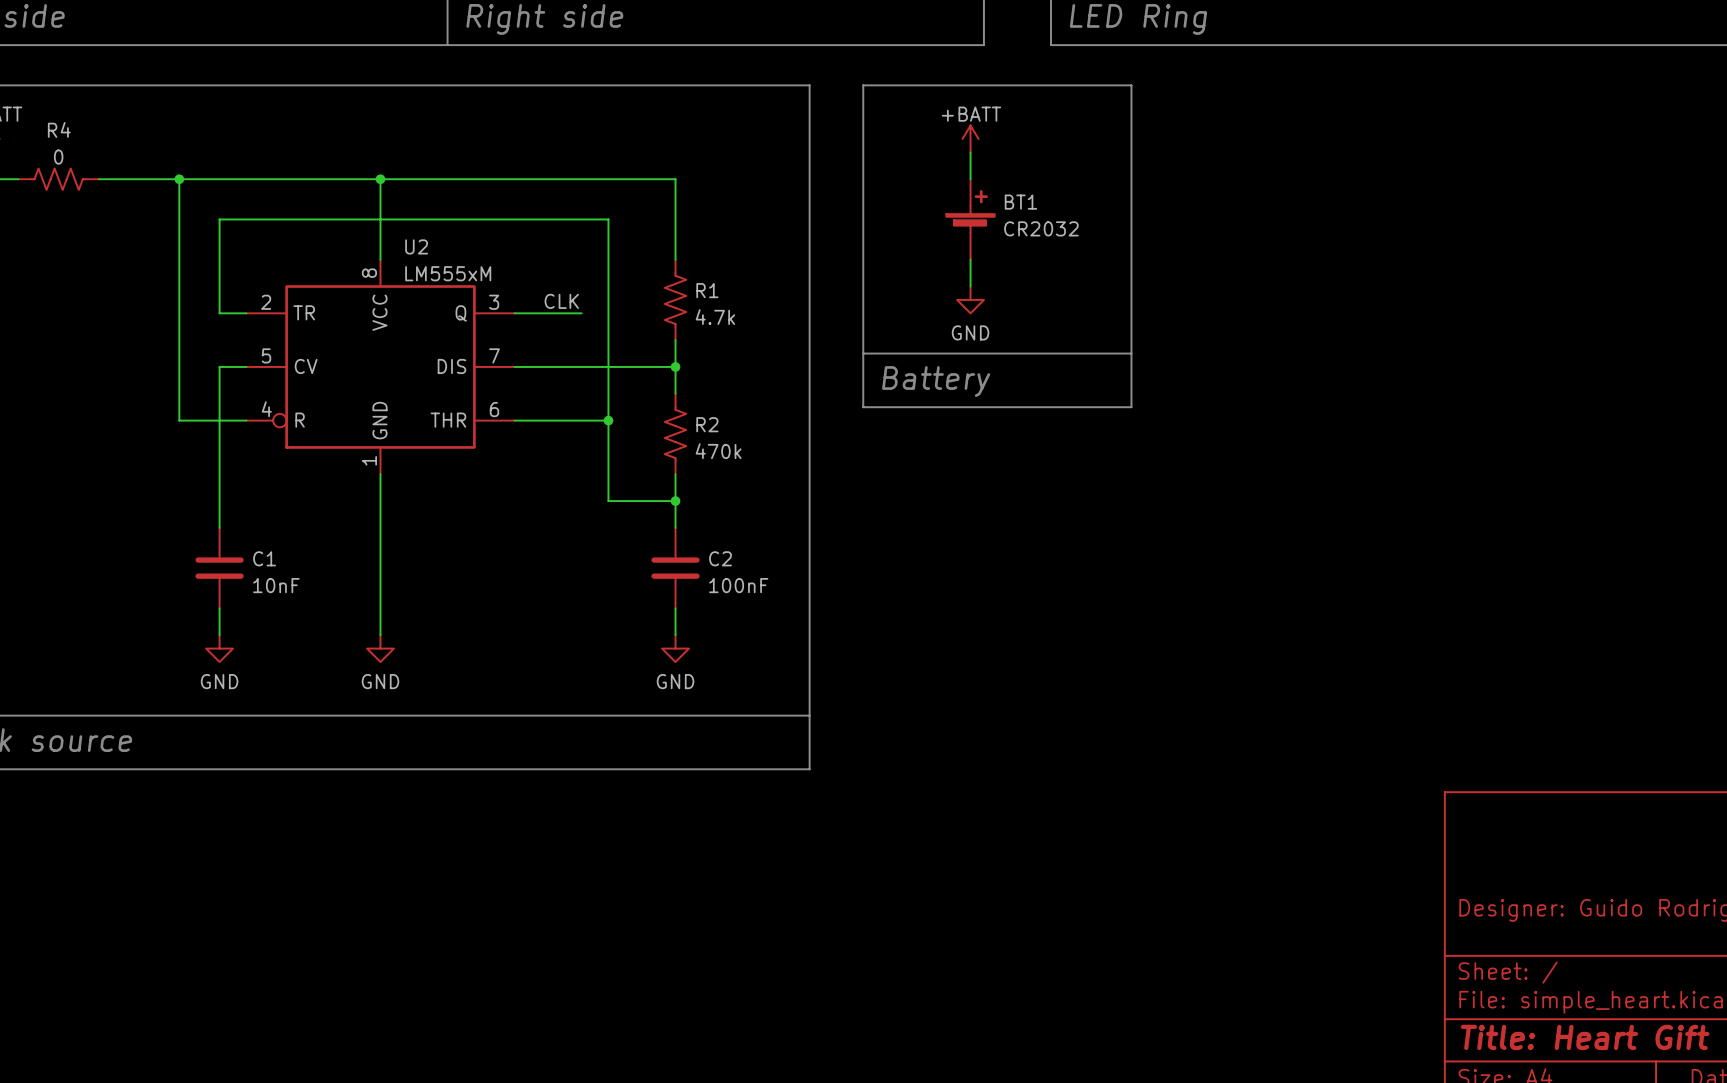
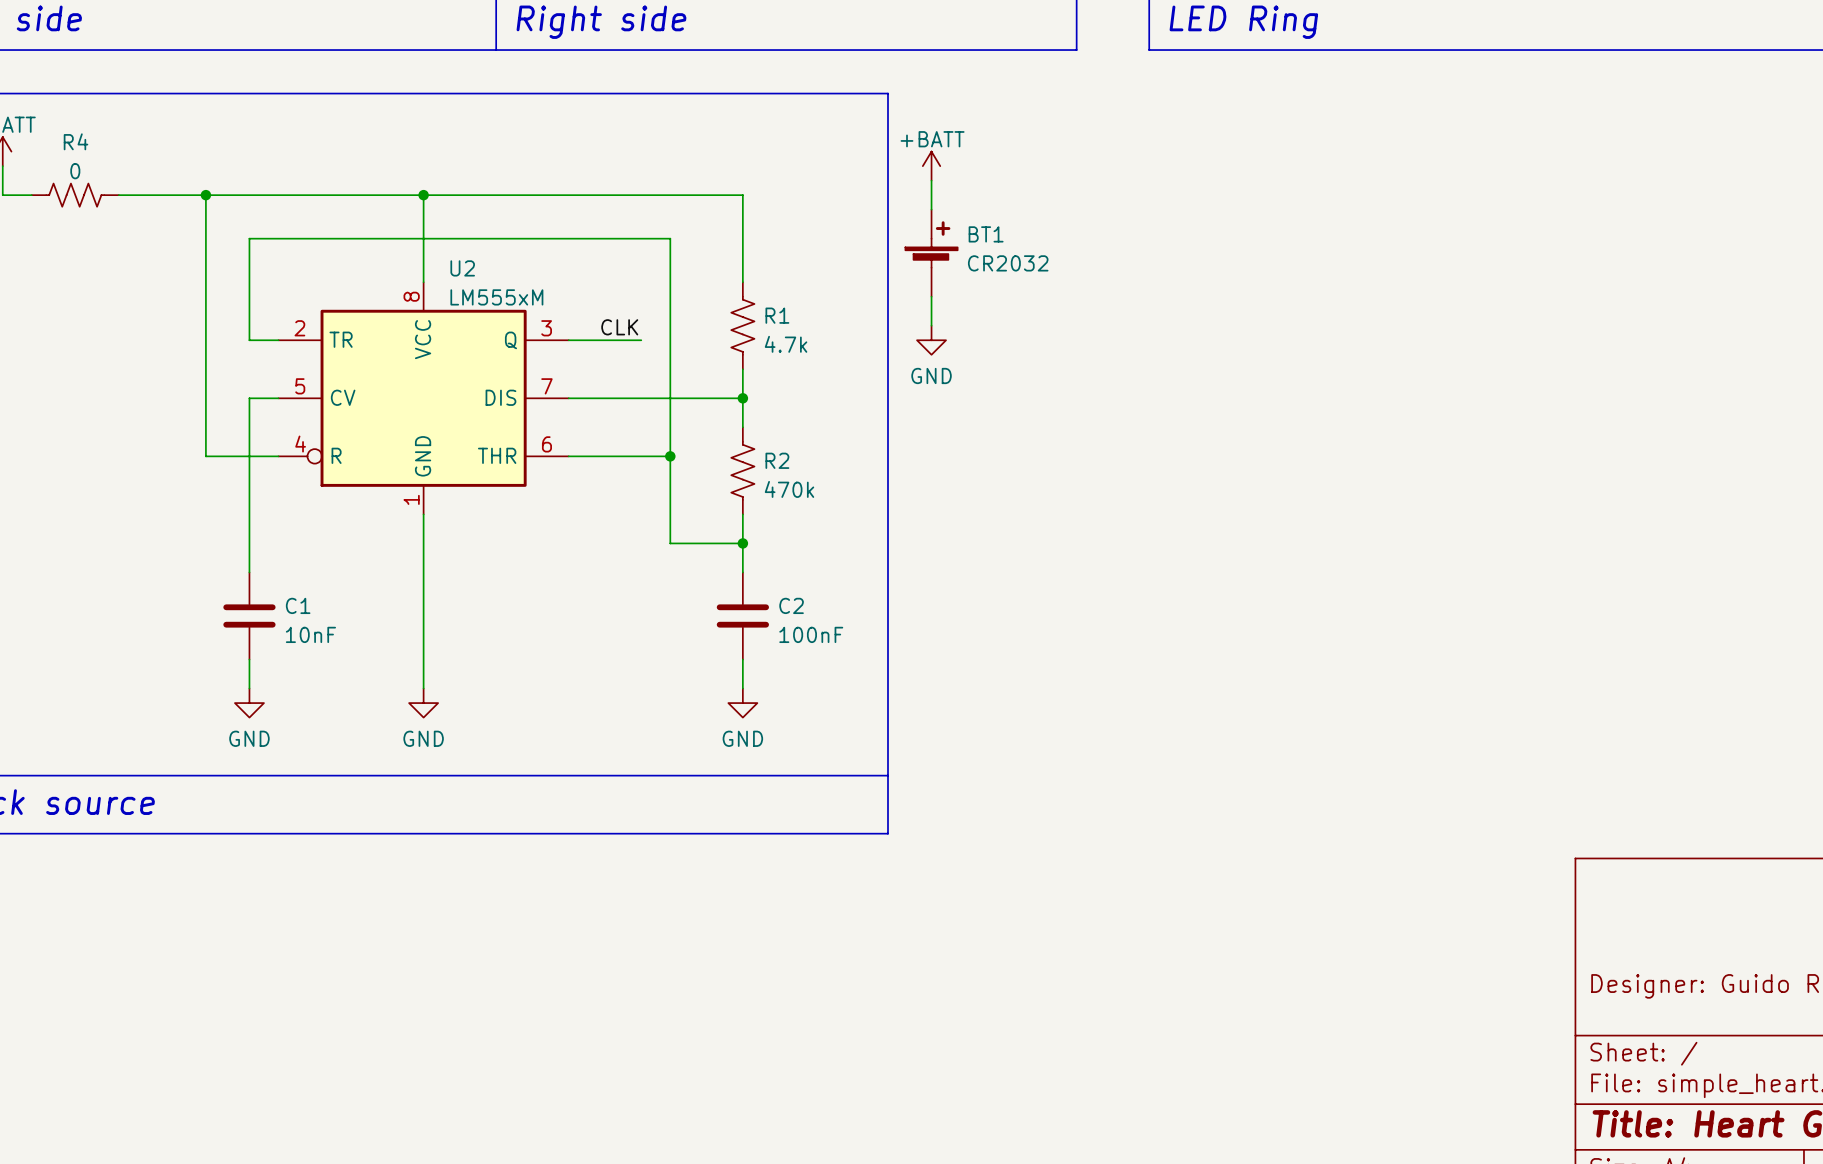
line: (863, 85) (1131, 85) (1131, 407) (863, 407) (863, 85) -> none
power symbol position: +BATT (970, 138) -> +BATT (931, 166)
wire: (970, 152) (970, 179) -> (931, 180) (931, 209)
BT1 position: (970, 219) -> (931, 253)
wire: (970, 259) (970, 286) -> (931, 296) (931, 325)
power symbol position: GND (970, 299) -> GND (931, 340)
line: (863, 353) (1131, 353) -> none
text: Battery (936, 381) -> none

